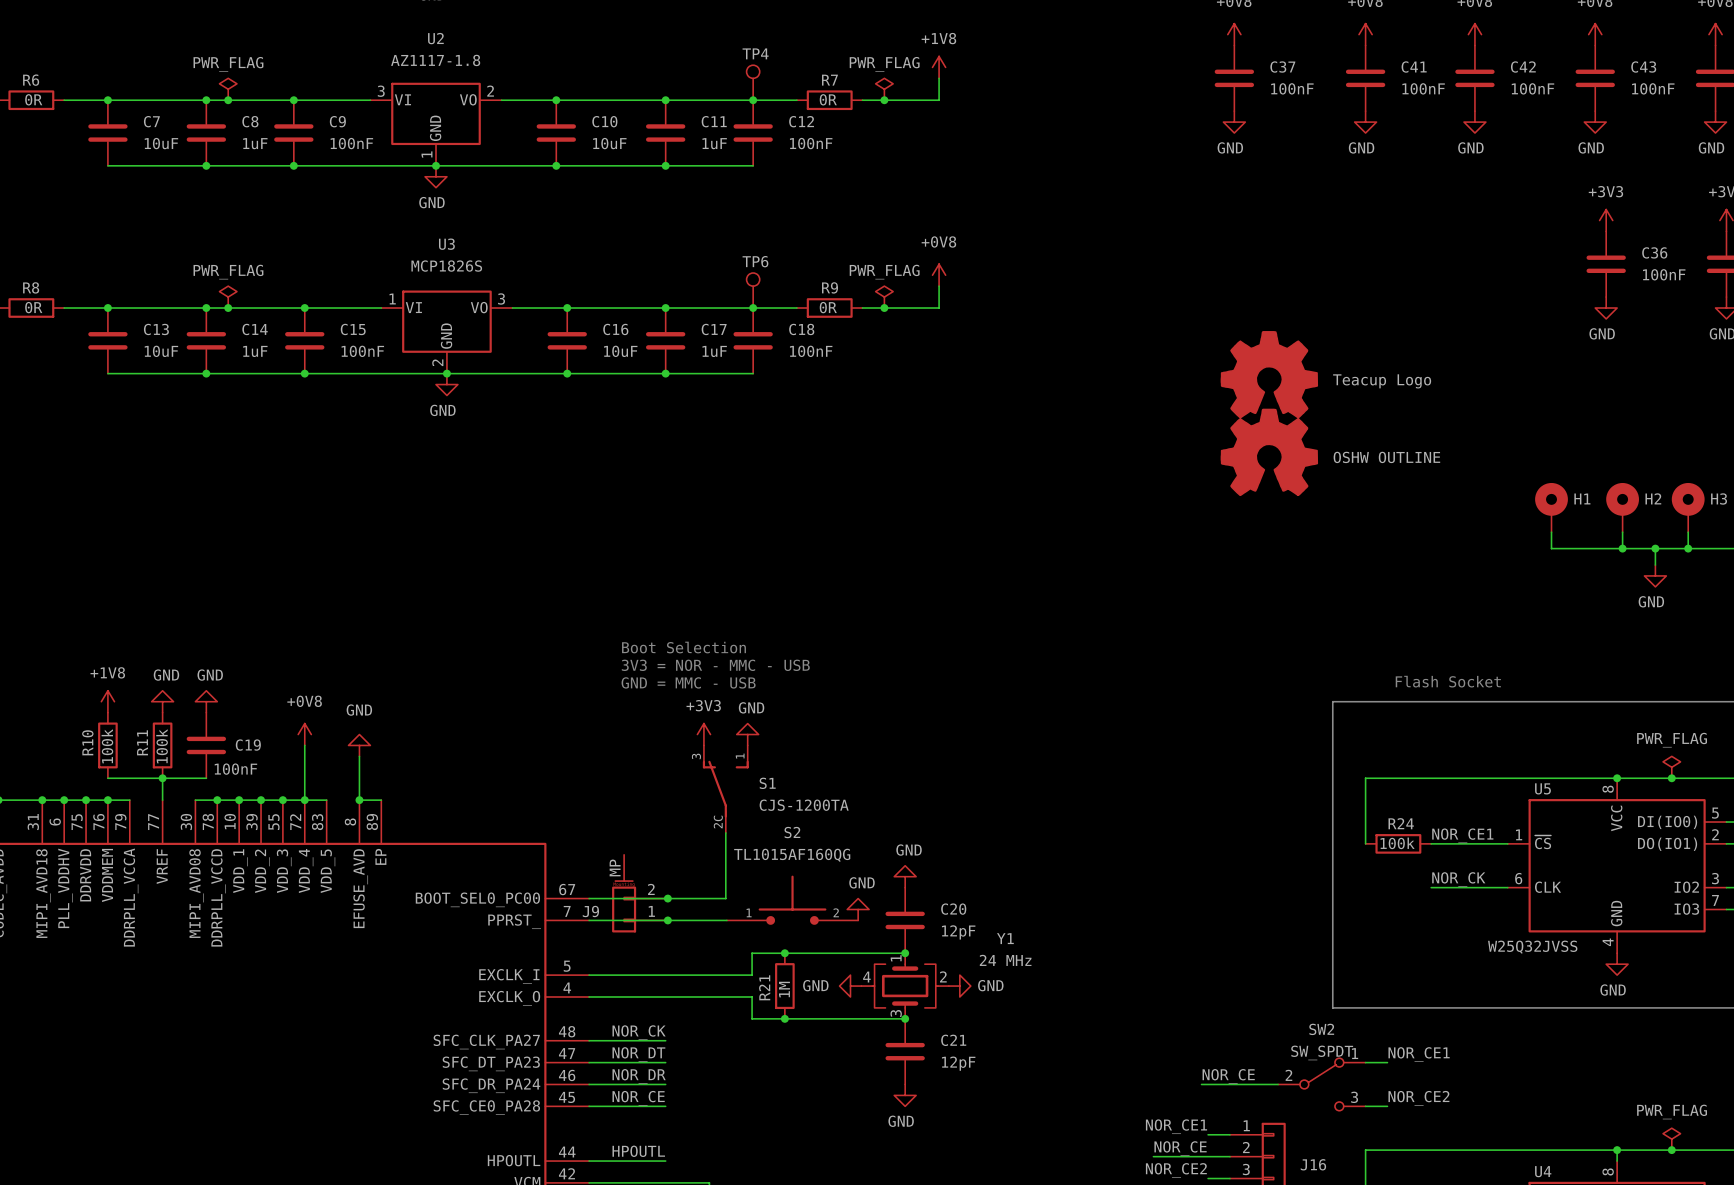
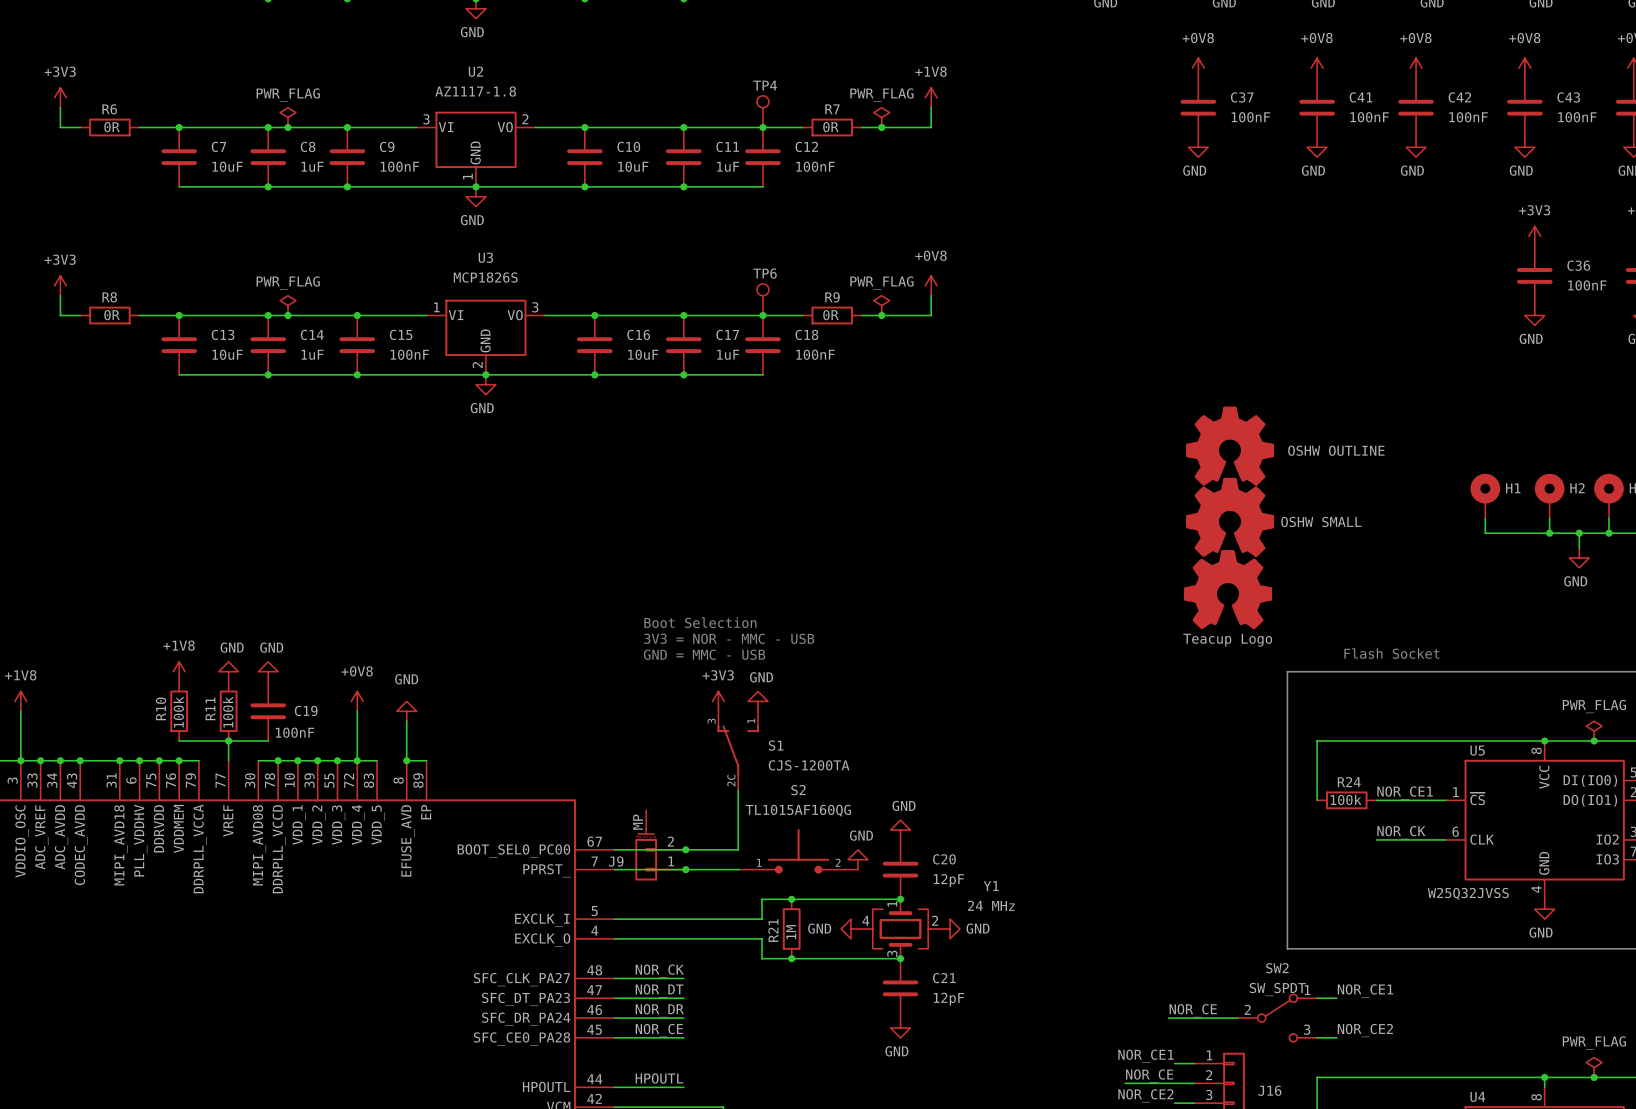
part: Teacup Logo (1269, 374) -> none
part: none -> OSHW SMALL (1230, 517)
part: none -> Teacup Logo (1228, 589)

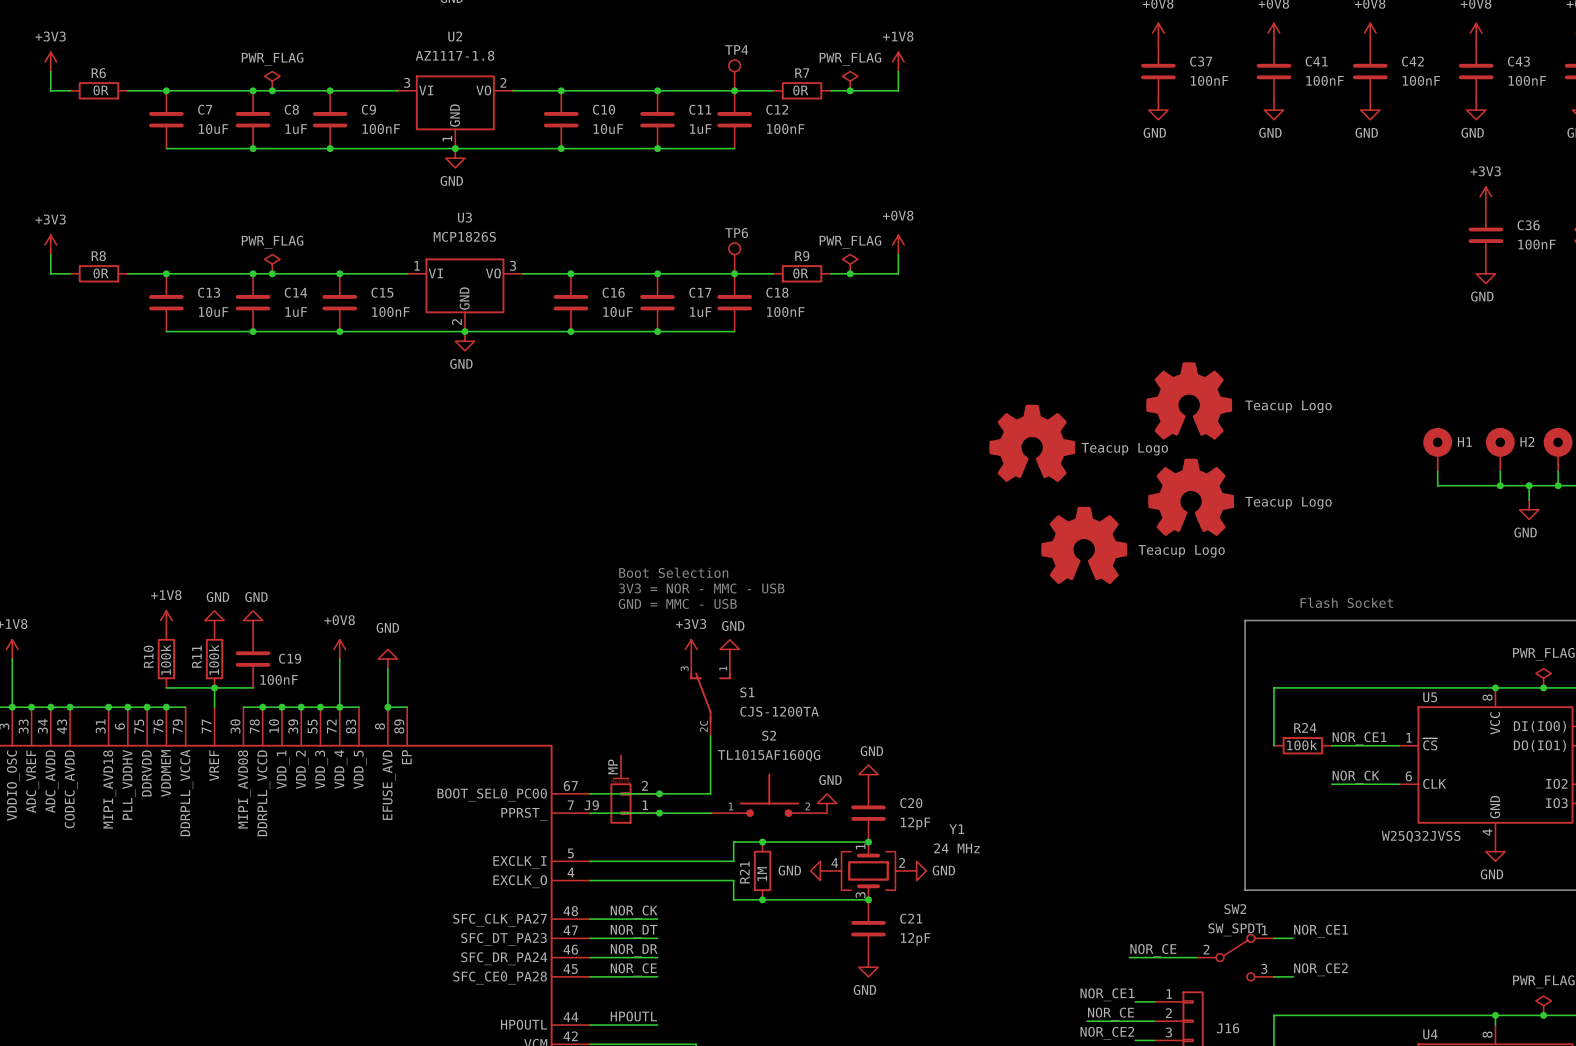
part value: OSHW OUTLINE (1336, 450) -> Teacup Logo (1288, 406)
part: none -> Teacup Logo (1032, 443)
part: OSHW SMALL (1230, 517) -> none
part position: (1228, 589) -> (1191, 497)
part: none -> Teacup Logo (1084, 545)
part value position: Teacup Logo (1227, 640) -> Teacup Logo (1288, 503)

